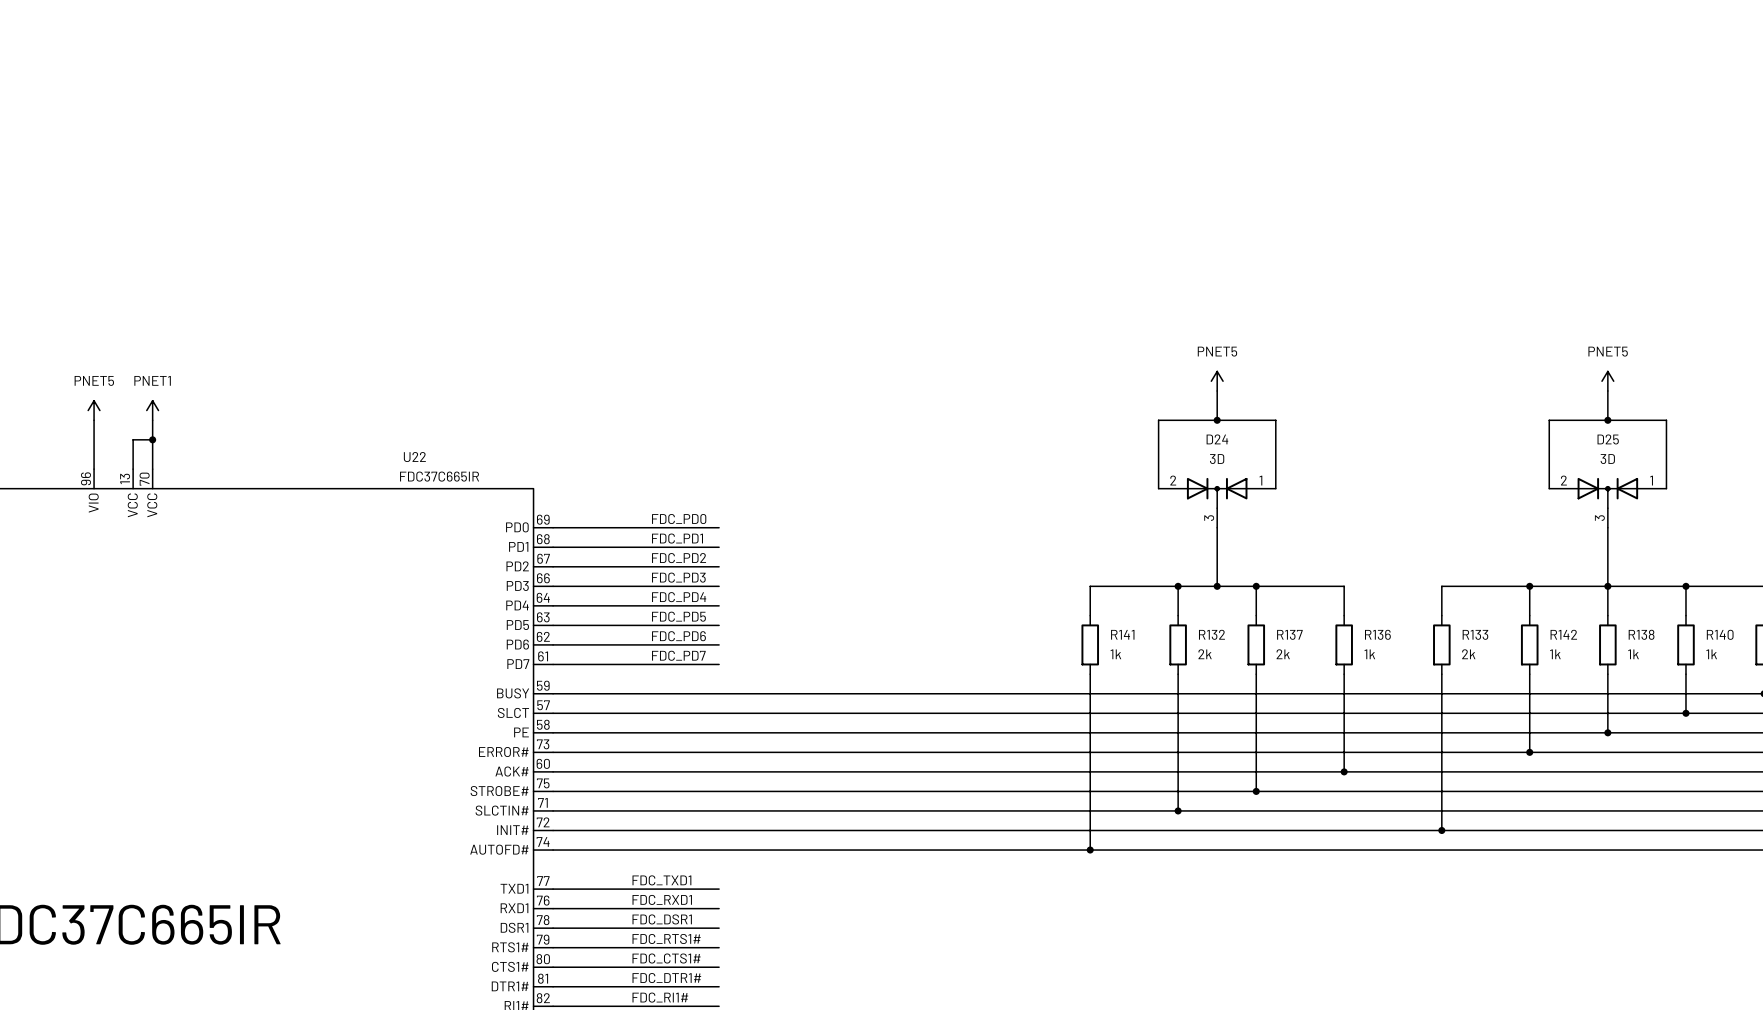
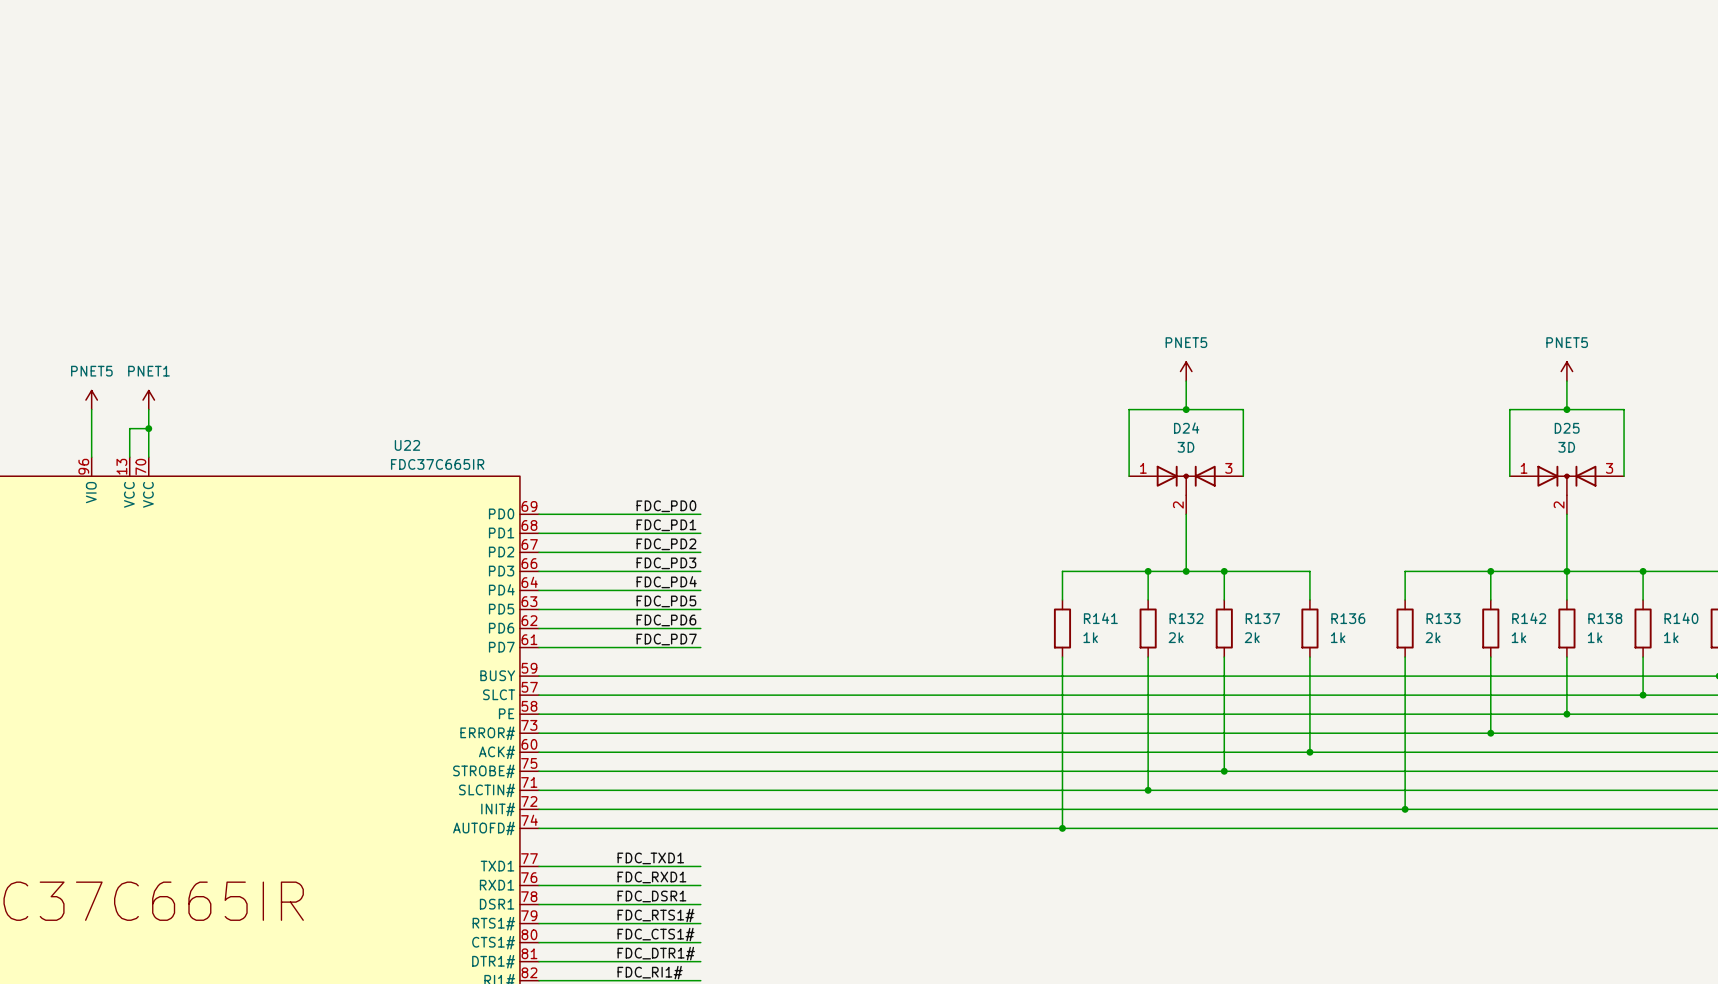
D24 symbol: [1158, 477, 1276, 528] -> [1129, 465, 1244, 515]
D25 symbol: [1549, 477, 1667, 528] -> [1509, 465, 1625, 515]

